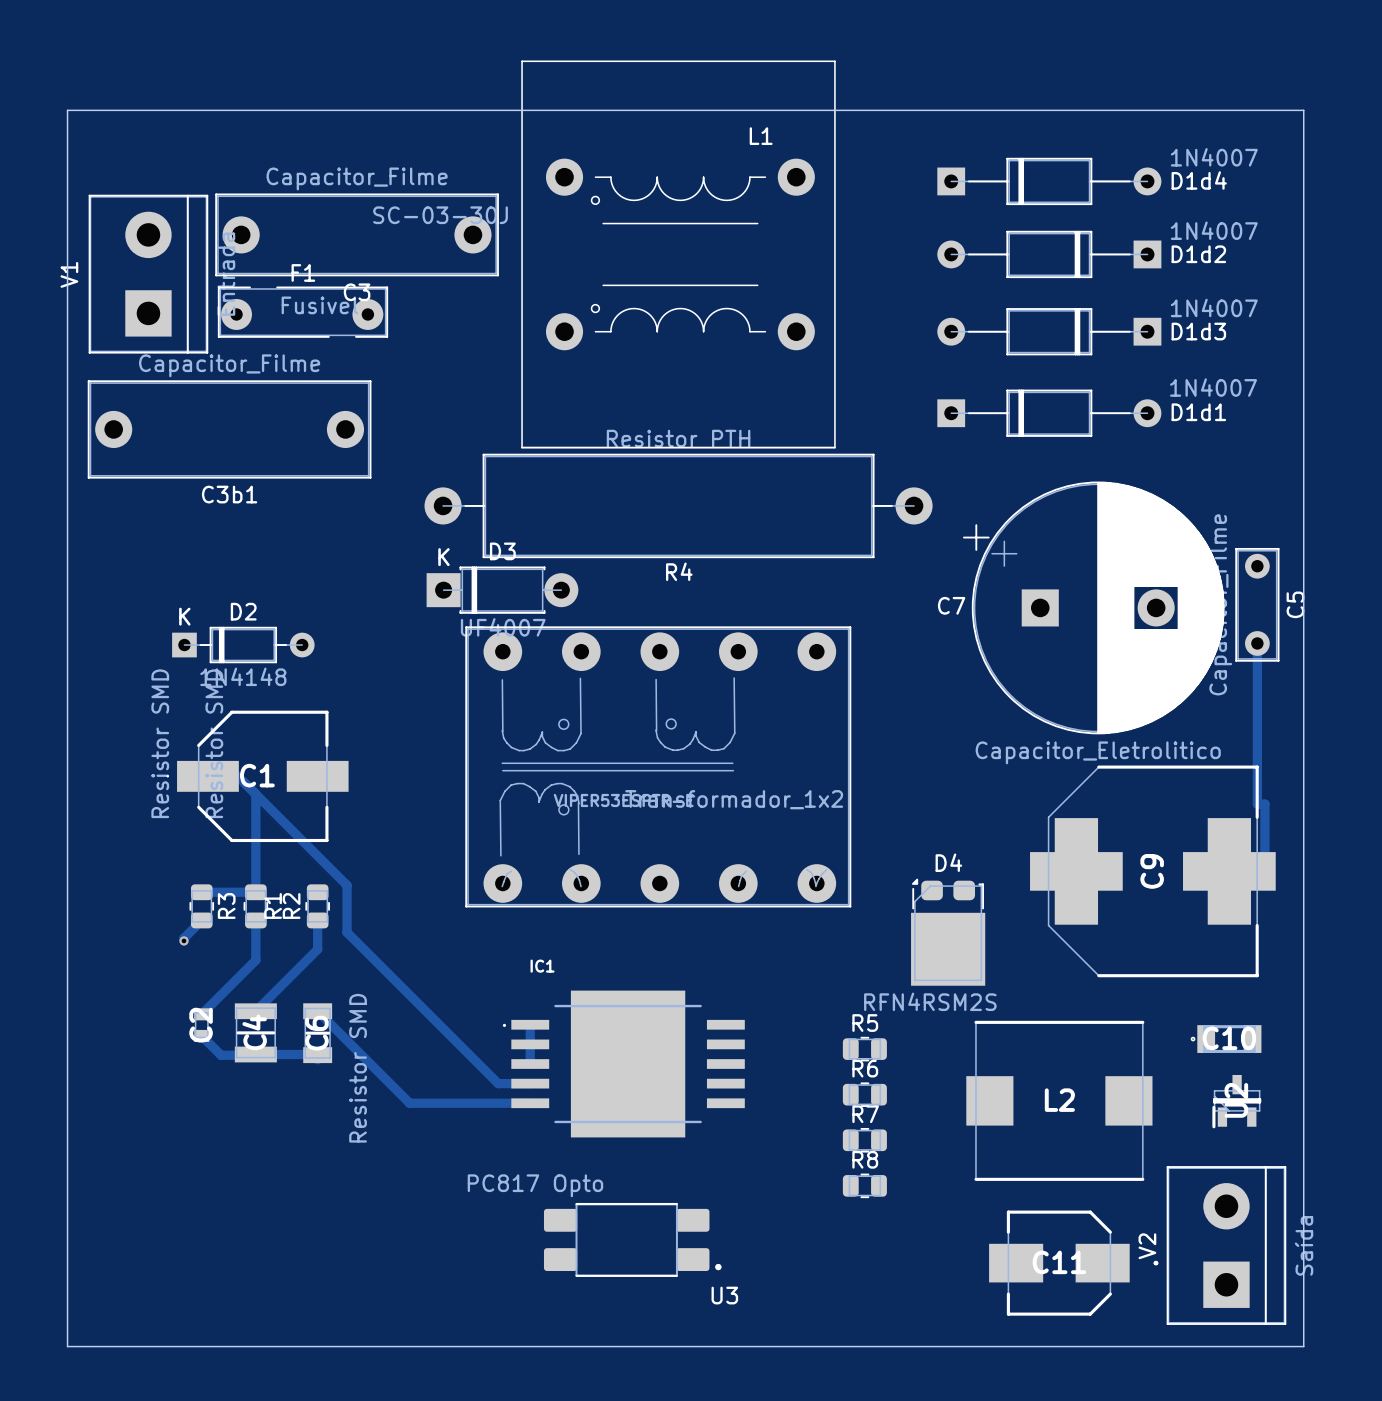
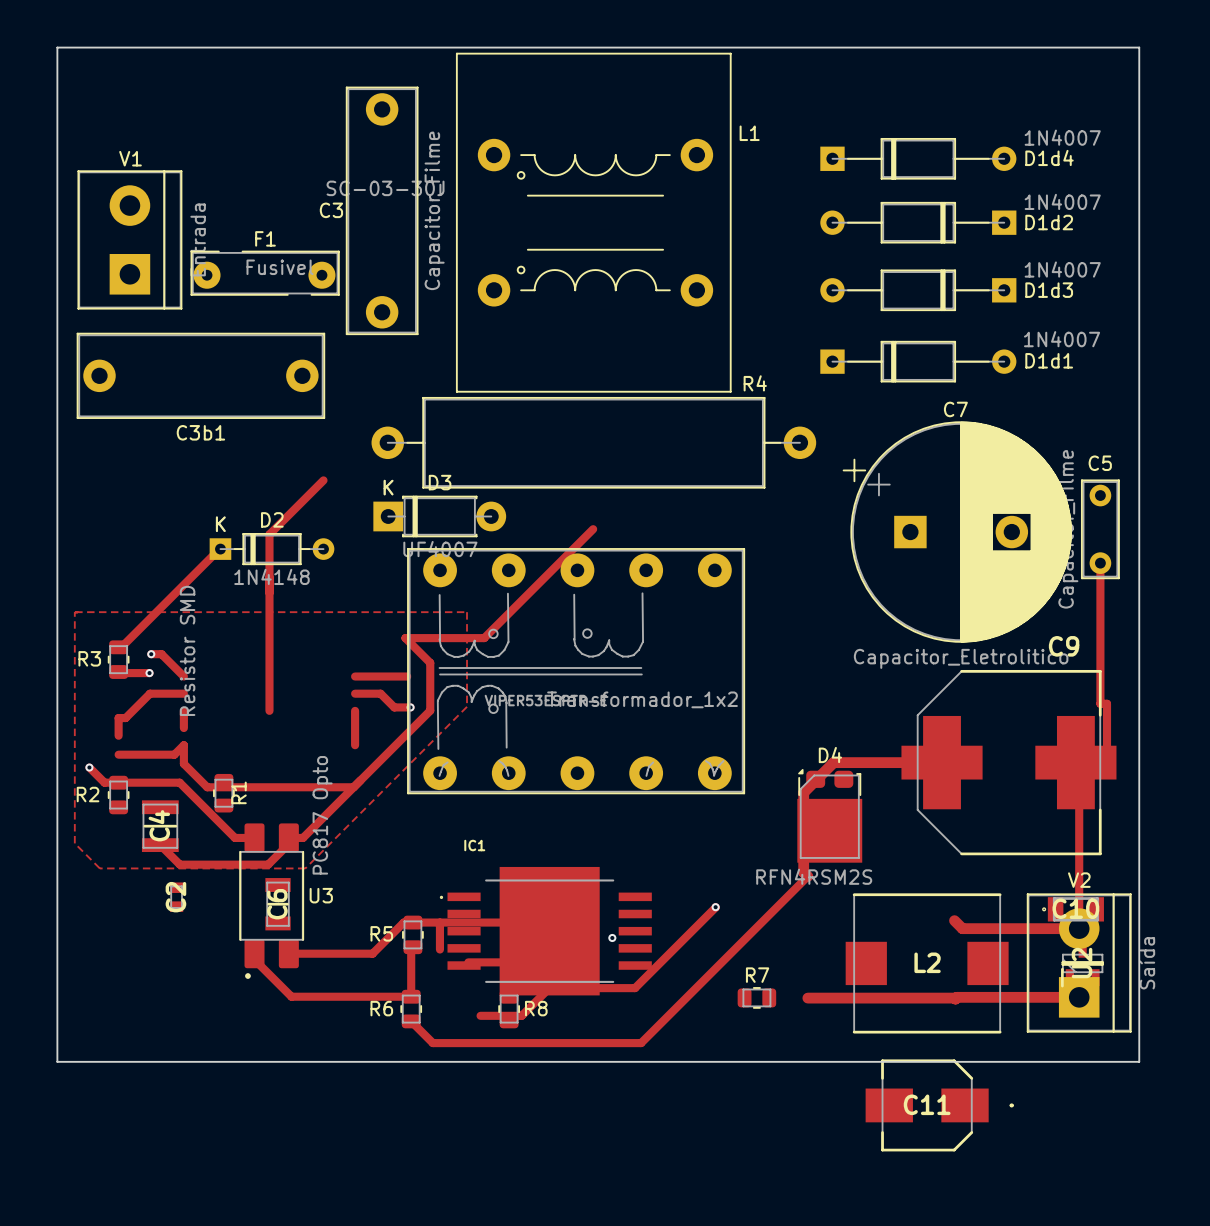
board edge: (67, 110) (1303, 110) (1303, 1346) (67, 1346) (67, 110) -> (57, 47) (57, 1061) (1139, 1061) (1139, 47) (57, 47)
L1 name position: L1 (761, 136) -> L1 (749, 133)
C3 rotation: 0° (357, 234) -> 90° clockwise (382, 210)
V1 name rotation: 0° (69, 274) -> 90° clockwise (130, 158)
V1 name position: V1 (69, 274) -> V1 (130, 158)
C3b1 value: Capacitor_Filme (229, 365) -> none
R4 value: Resistor PTH (678, 438) -> none
track: none -> (323, 480) (269, 534) (269, 710)
R4 name position: R4 (679, 571) -> R4 (755, 383)
track: none -> (593, 529) (484, 638) (405, 638) (430, 662) (430, 710) (303, 837) (288, 837) (288, 843) (268, 864) (179, 864) (160, 845)
C5 name rotation: 0° (1295, 604) -> 90° clockwise (1100, 463)
C5 name position: C5 (1295, 604) -> C5 (1100, 463)
C7 name position: C7 (951, 605) -> C7 (955, 409)
track: none -> (220, 549) (121, 647) (118, 647)
D2 position: (243, 645) -> (271, 549)
zone outline: none -> (74, 612) (467, 612) (467, 706) (305, 868) (99, 868) (74, 843) (74, 612)
R3 value: Resistor SMD (160, 743) -> none
track: none -> (151, 654) (161, 654) (183, 676)
via: none -> (151, 654)
track: none -> (118, 673) (149, 673)
via: none -> (149, 673)
track: none -> (355, 676) (407, 676)
track: (207, 776) (238, 776) (347, 885) (347, 932) (498, 1083) (530, 1083) -> none
C1: (257, 776) -> none
track: none -> (183, 693) (150, 693) (125, 718) (118, 718) (118, 735)
track: none -> (355, 693) (380, 693) (394, 707) (410, 707)
track: (255, 794) (255, 892) (201, 892) -> none
via: none -> (410, 707)
track: none -> (183, 710) (183, 728)
track: none -> (118, 754) (174, 754) (183, 745) (183, 763) (207, 787) (353, 787)
track: none -> (942, 762) (833, 762) (803, 792) (803, 872) (807, 876) (641, 1043) (432, 1043) (411, 1021)
C9 name rotation: 0° (1152, 871) -> 90° clockwise (1064, 646)
C9 name position: C9 (1152, 871) -> C9 (1064, 646)
track: none -> (1079, 765) (1079, 922) (1075, 925)
track: none -> (89, 767) (104, 782) (179, 782) (235, 837) (254, 837)
via: none -> (89, 767)
R3 name rotation: 0° (226, 905) -> 90° clockwise (89, 658)
R3 name position: R3 (226, 905) -> R3 (89, 658)
R2 name rotation: 0° (291, 905) -> 90° clockwise (88, 794)
R3 position: (201, 906) -> (118, 659)
R2 position: (317, 906) -> (118, 795)
track: (201, 920) (184, 938) (184, 940) -> none
track: (255, 920) (255, 960) (201, 1014) -> none
track: (317, 920) (317, 949) (255, 1011) -> none
via: (184, 940) -> none
track: (317, 1011) (409, 1103) (530, 1103) -> none
R5 name position: R5 (865, 1023) -> R5 (381, 933)
track: (530, 1024) (530, 1064) -> (355, 710) (355, 745)
C4 position: (255, 1032) -> (160, 826)
track: (201, 1035) (221, 1055) (312, 1054) (317, 1059) -> none
track: none -> (715, 907) (635, 988) (549, 988) (521, 1015) (480, 1015)
via: none -> (715, 907)
R5 rotation: 0° (864, 1049) -> 90° clockwise (412, 934)
R5 position: (864, 1049) -> (412, 934)
track: none -> (954, 920) (962, 928) (1079, 928)
track: none -> (439, 922) (439, 949)
track: none -> (509, 923) (403, 922) (372, 953) (288, 953)
R2 value: Resistor SMD (358, 1068) -> none
R6 name position: R6 (865, 1068) -> R6 (381, 1008)
via: none -> (612, 937)
track: none -> (412, 947) (411, 948) (411, 996) (291, 996) (254, 959) (254, 953)
R6 rotation: 0° (864, 1094) -> 90° clockwise (411, 1009)
R6 position: (864, 1094) -> (411, 1009)
track: none -> (468, 962) (509, 963)
track: none -> (1079, 997) (807, 998)
R8 rotation: 0° (864, 1185) -> 90° clockwise (509, 1009)
R8 position: (864, 1185) -> (509, 1009)
U3 rotation: 0° (632, 1239) -> 90° clockwise (271, 901)
U3 position: (632, 1239) -> (271, 901)
V2 position: (1226, 1245) -> (1079, 963)
V2 name rotation: 0° (1147, 1246) -> 90° clockwise (1079, 880)
V2 name position: V2 (1147, 1246) -> V2 (1079, 880)
U3 name position: U3 (724, 1295) -> U3 (321, 895)

